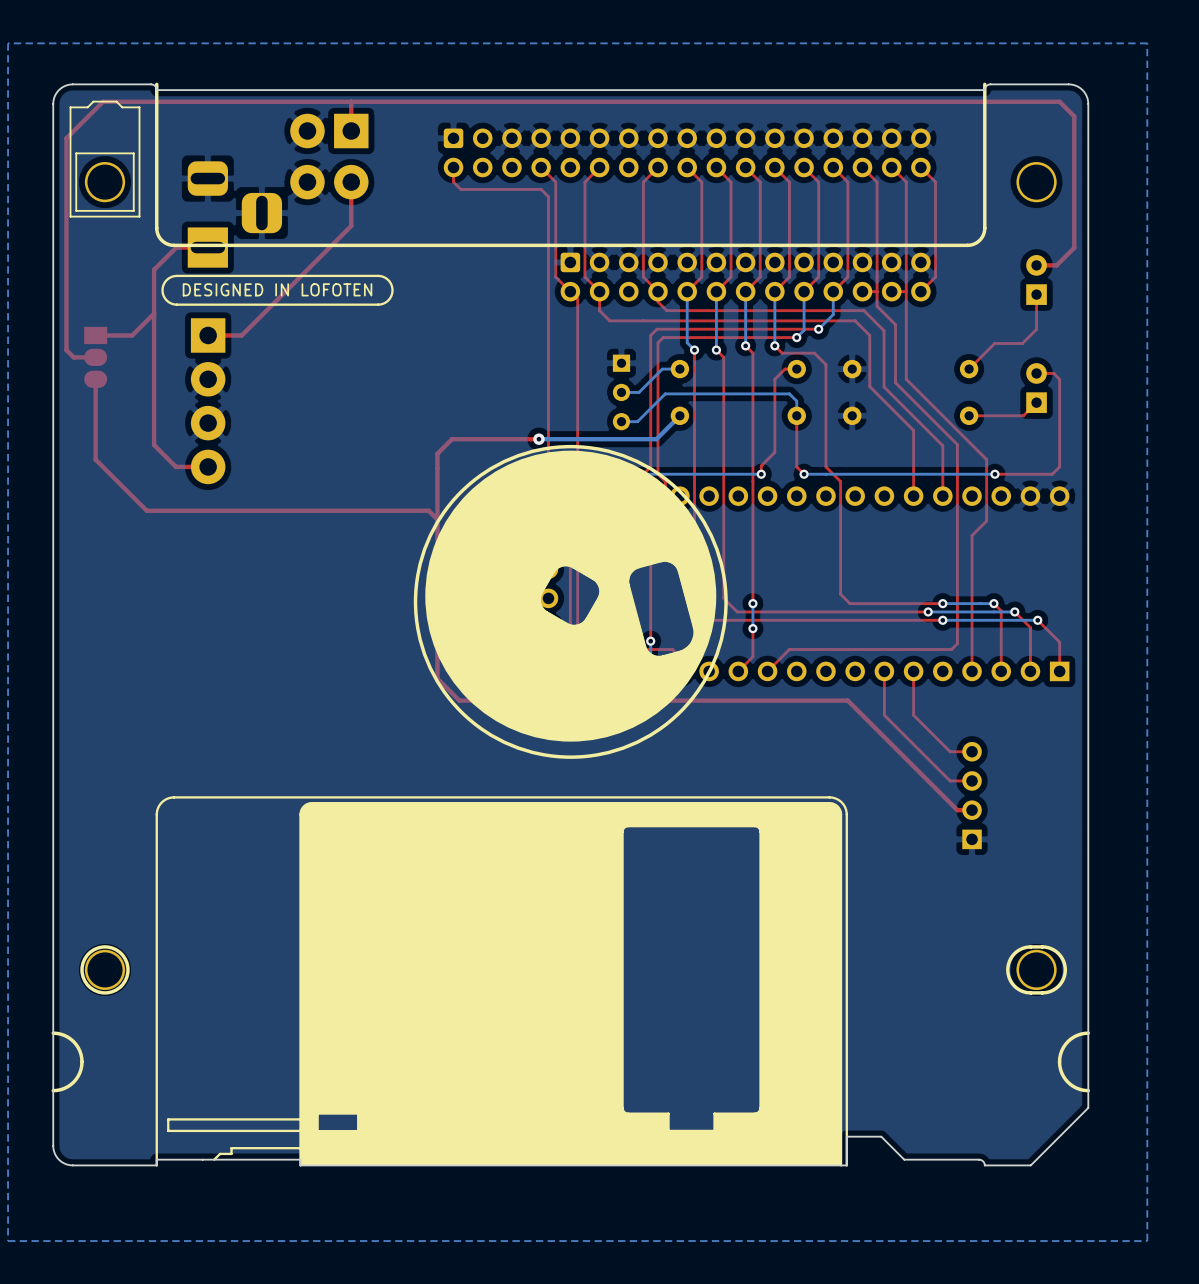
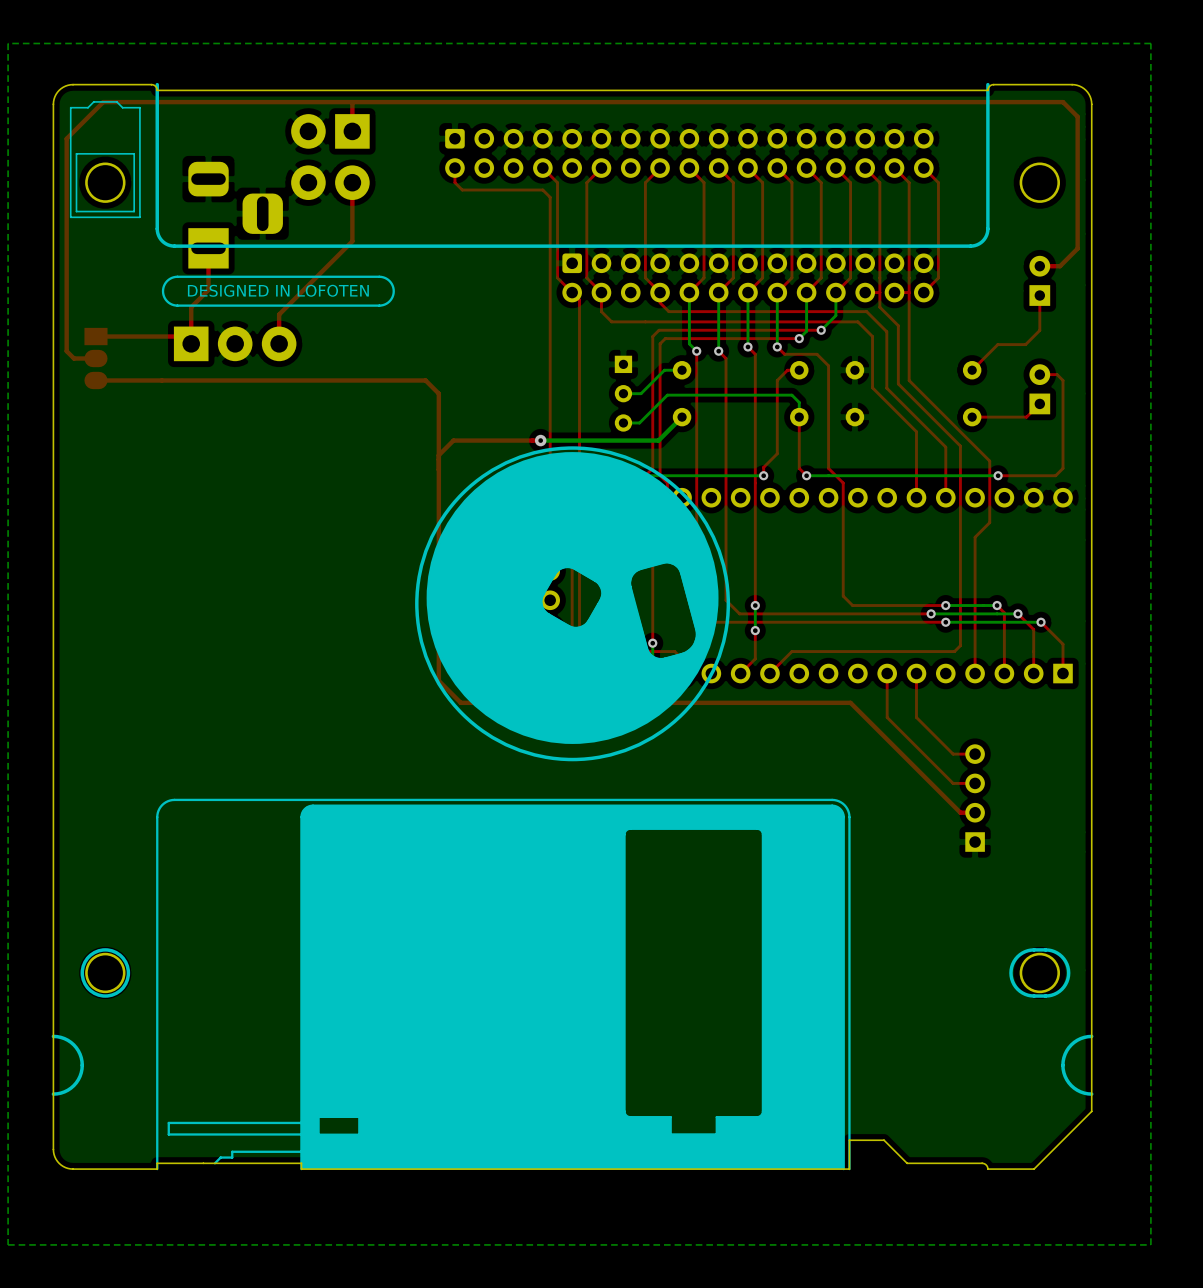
top track: (351, 225) (241, 335) (208, 335) -> (352, 226) (352, 241) (279, 314) (279, 343)
top track: (207, 247) (176, 247) (154, 269) (154, 445) (176, 466) (208, 466) -> none
top track: (154, 313) (132, 335) -> (208, 248) (208, 289) (191, 307) (191, 343) (183, 336) (132, 336)
part: none -> (235, 343)
top track: (95, 379) (95, 459) (146, 510) (428, 510) (437, 519) -> (95, 380) (425, 380) (438, 393) (438, 455)
part: (208, 401) -> none

